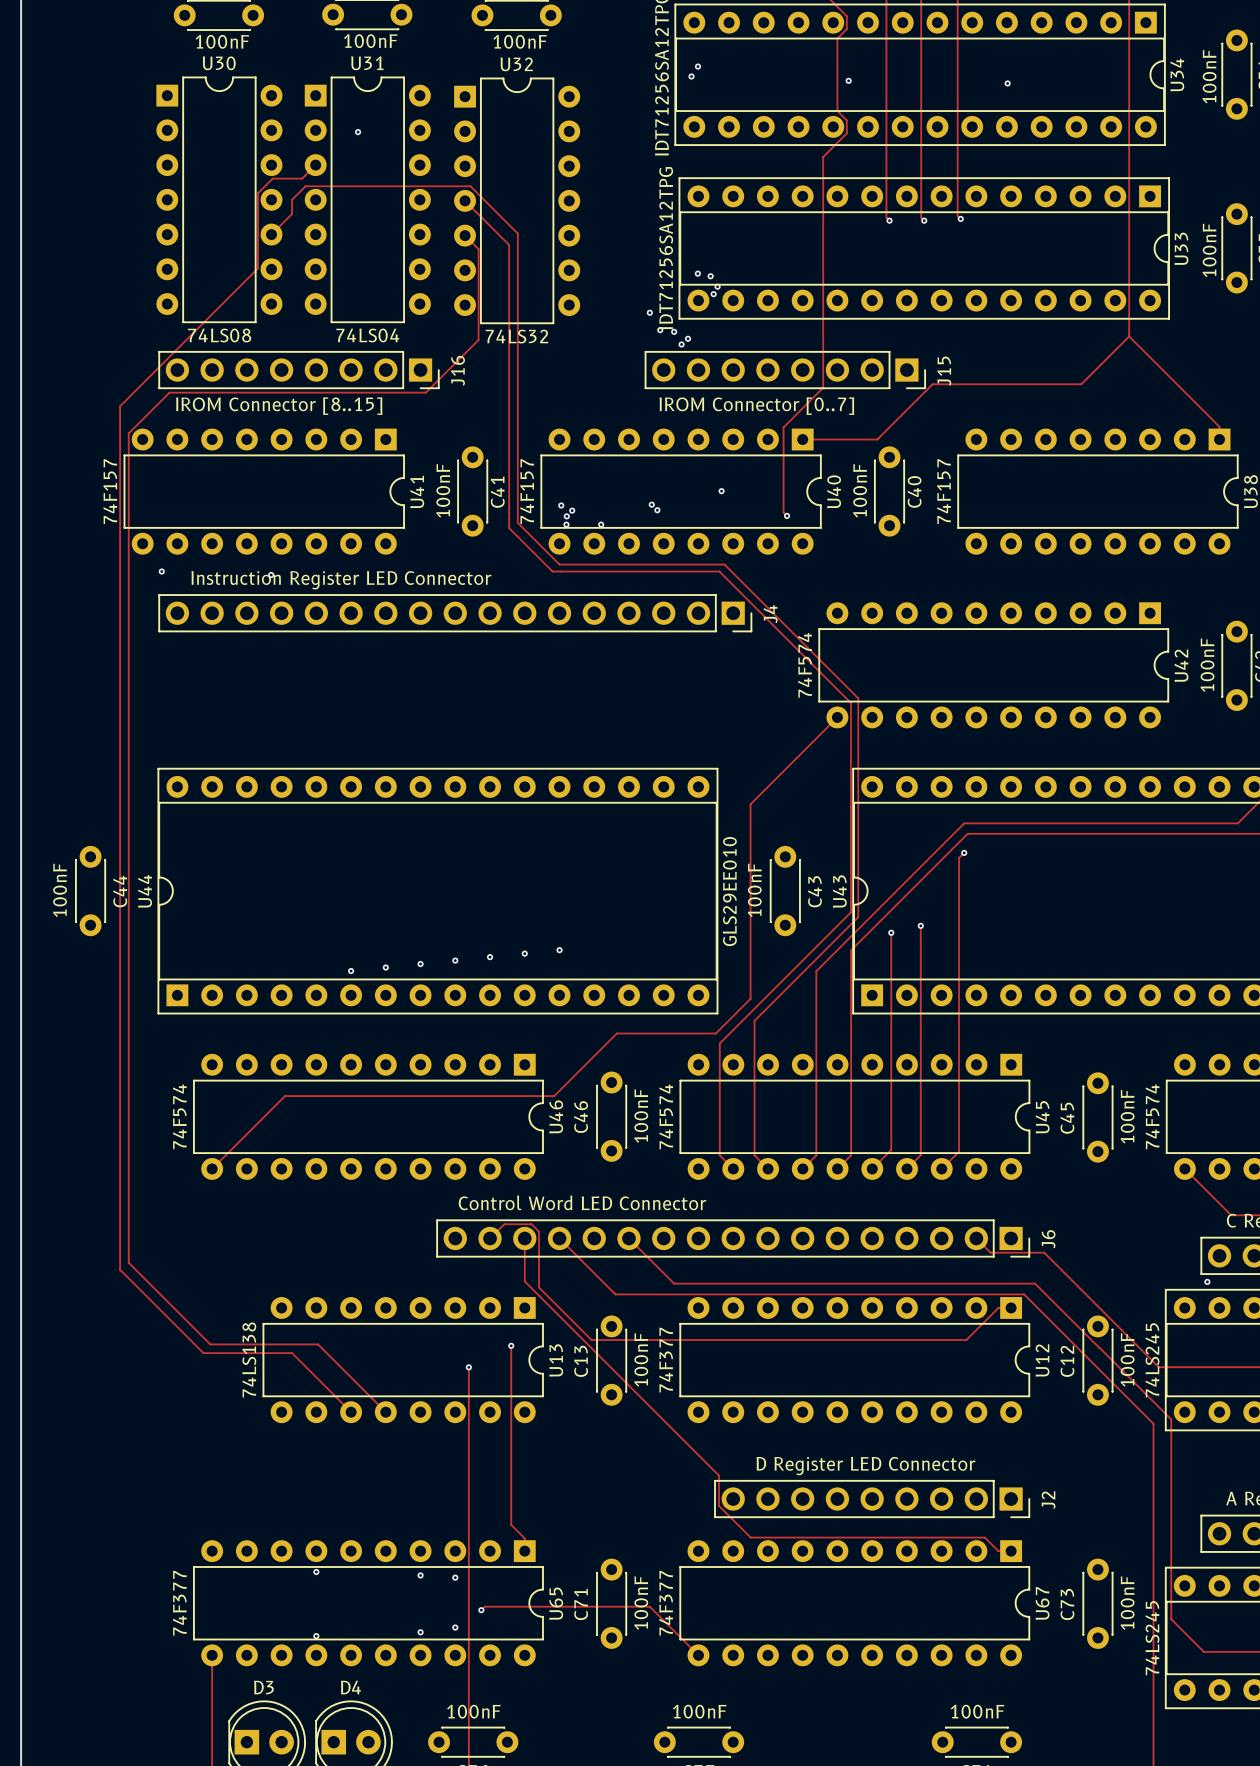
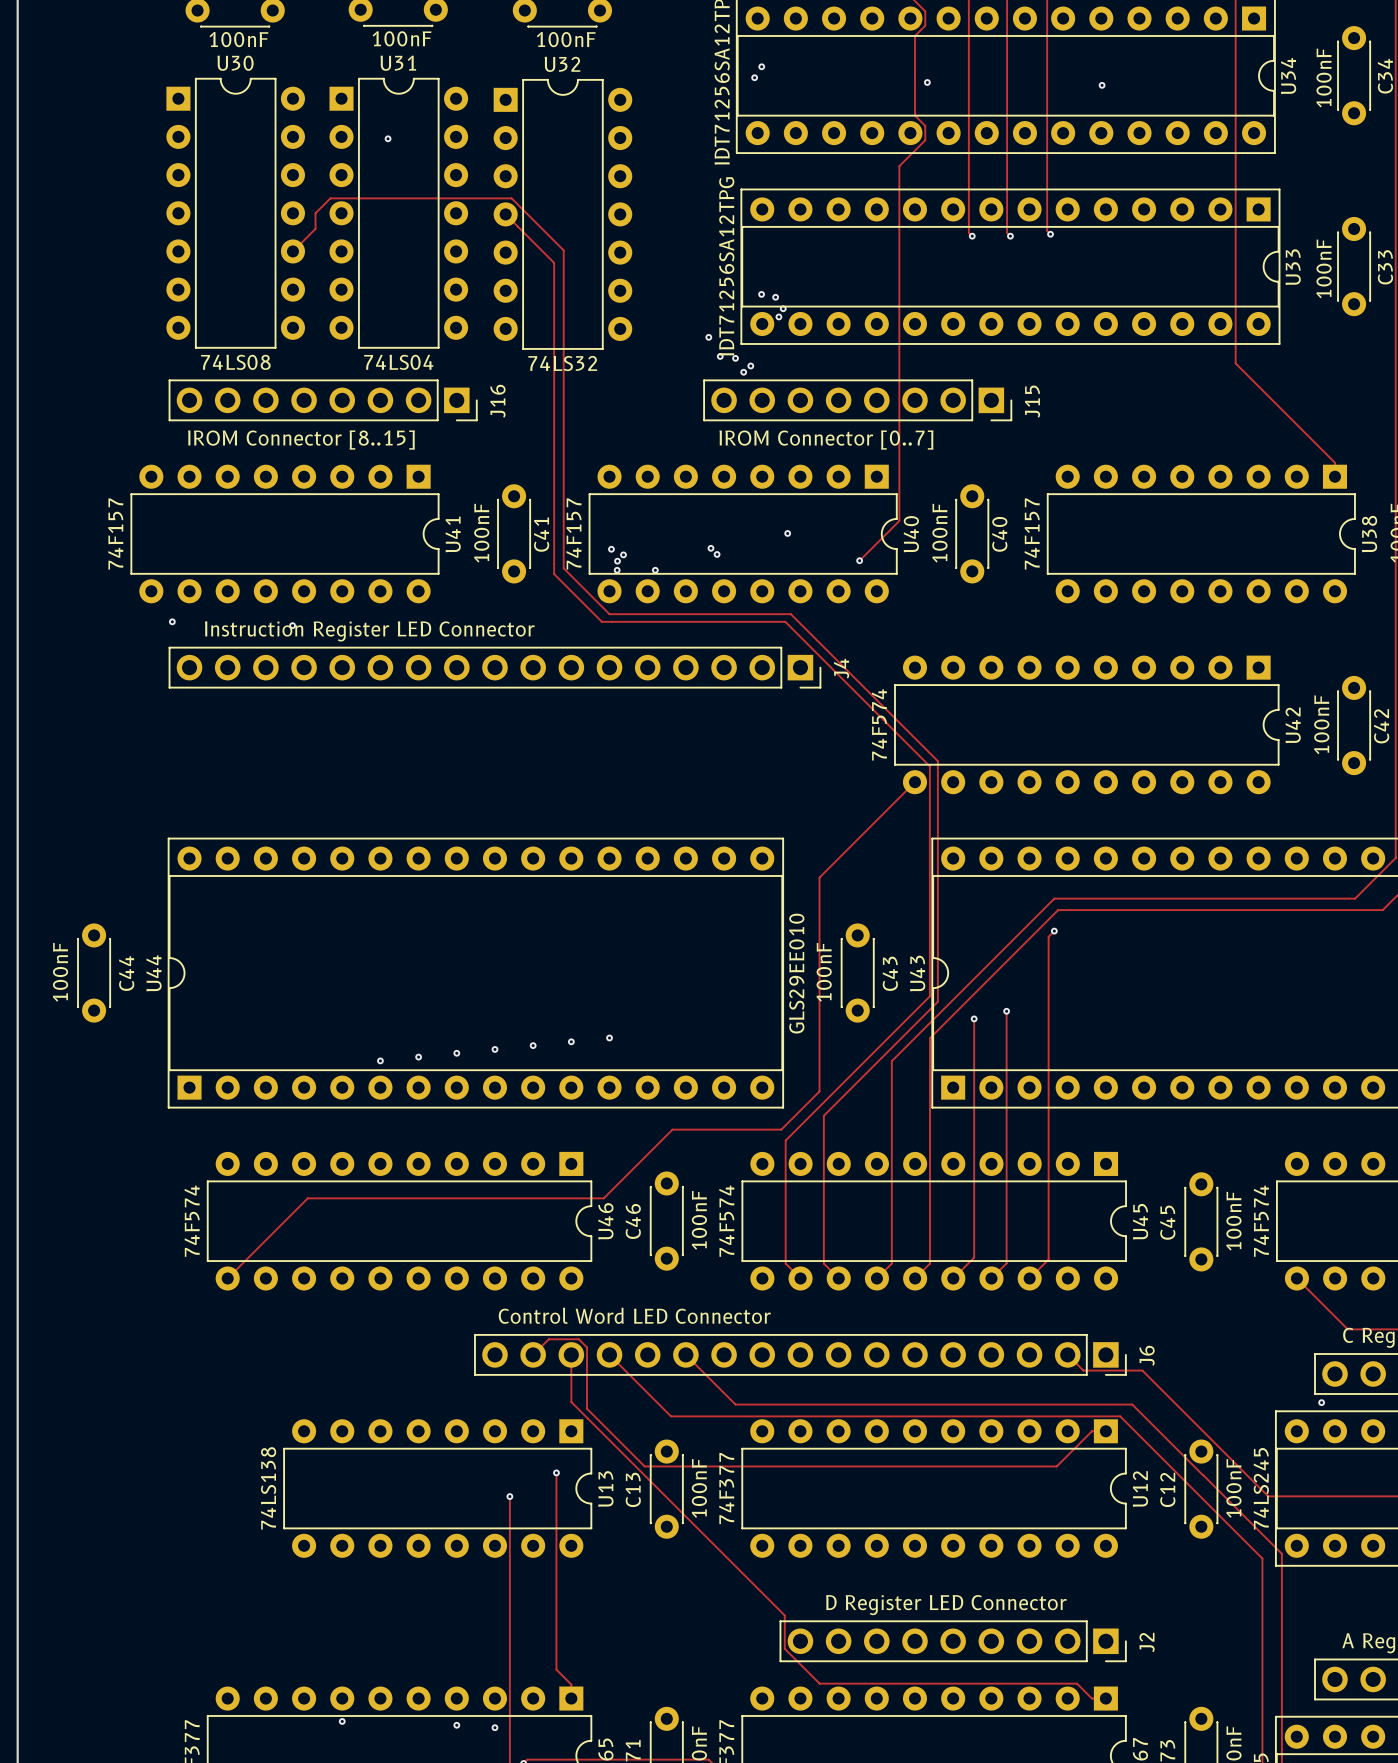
track: (315, 165) (302, 178) (272, 178) (257, 193) (257, 268) (120, 406) (120, 1269) (203, 1353) (292, 1353) (351, 1412) -> none
track: (465, 235) (478, 249) (478, 339) (425, 392) (169, 392) (128, 433) (128, 1262) (210, 1344) (318, 1344) (385, 1412) -> none
track: (1129, 336) (1081, 384) (932, 384) (877, 439) (802, 439) -> none
track: (823, 387) (783, 427) (783, 512) (787, 515) -> (899, 419) (899, 521) (859, 560)

